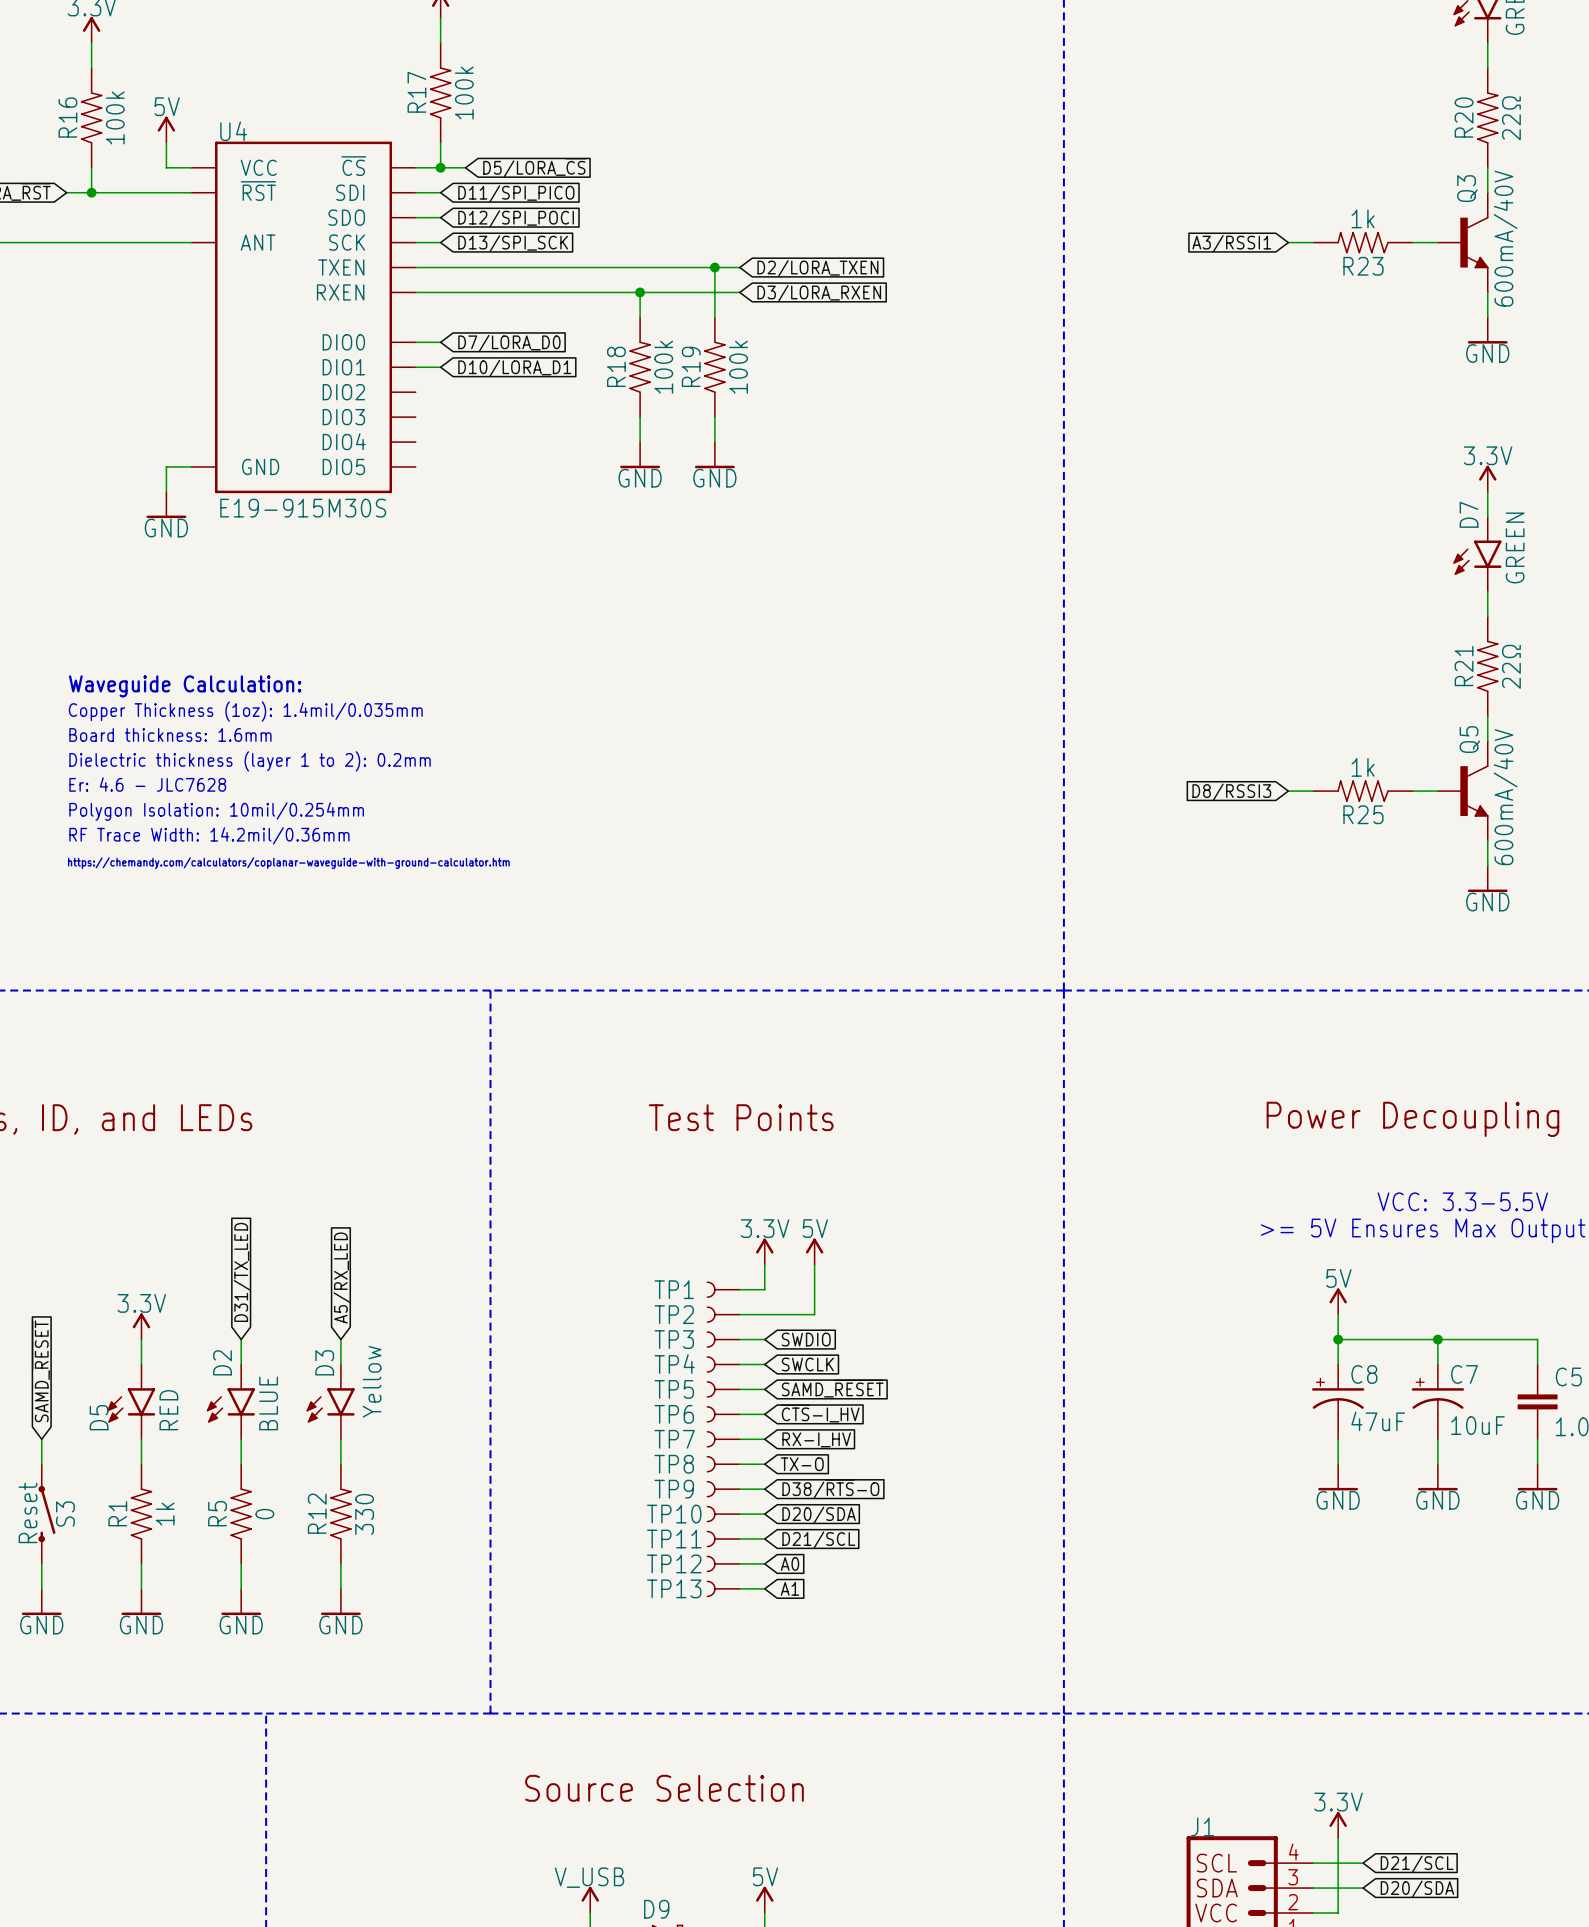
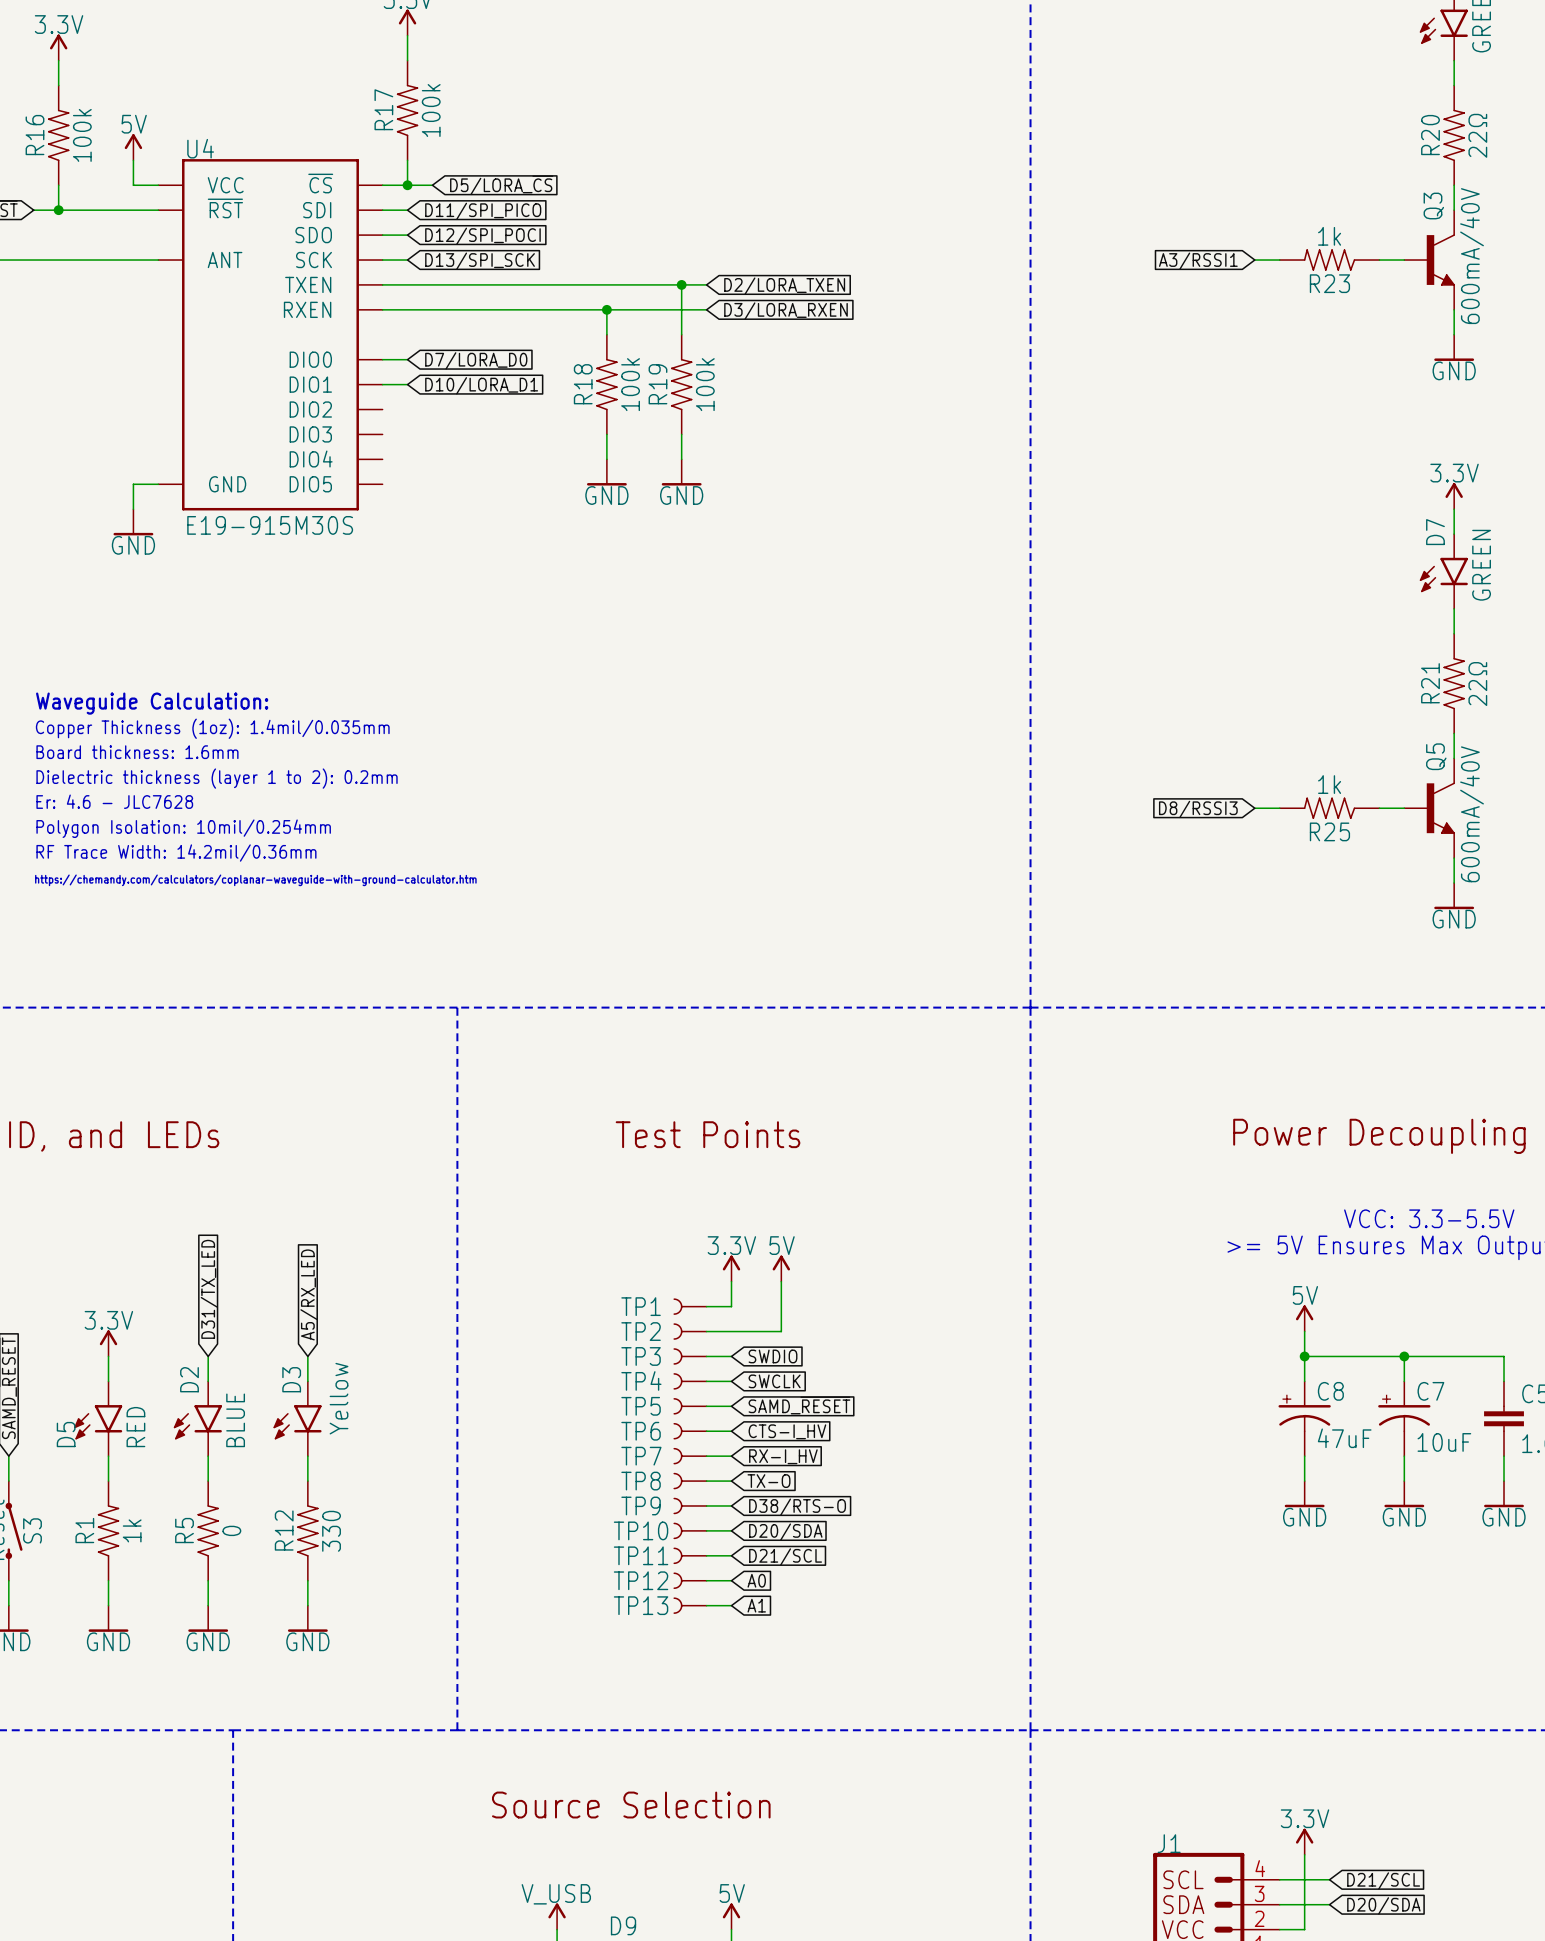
global label: ~{CTS}-I_HV (820, 1413) -> CTS-I_HV (787, 1431)
global label: D38/~{RTS}-O (830, 1489) -> D38/RTS-O (797, 1507)

